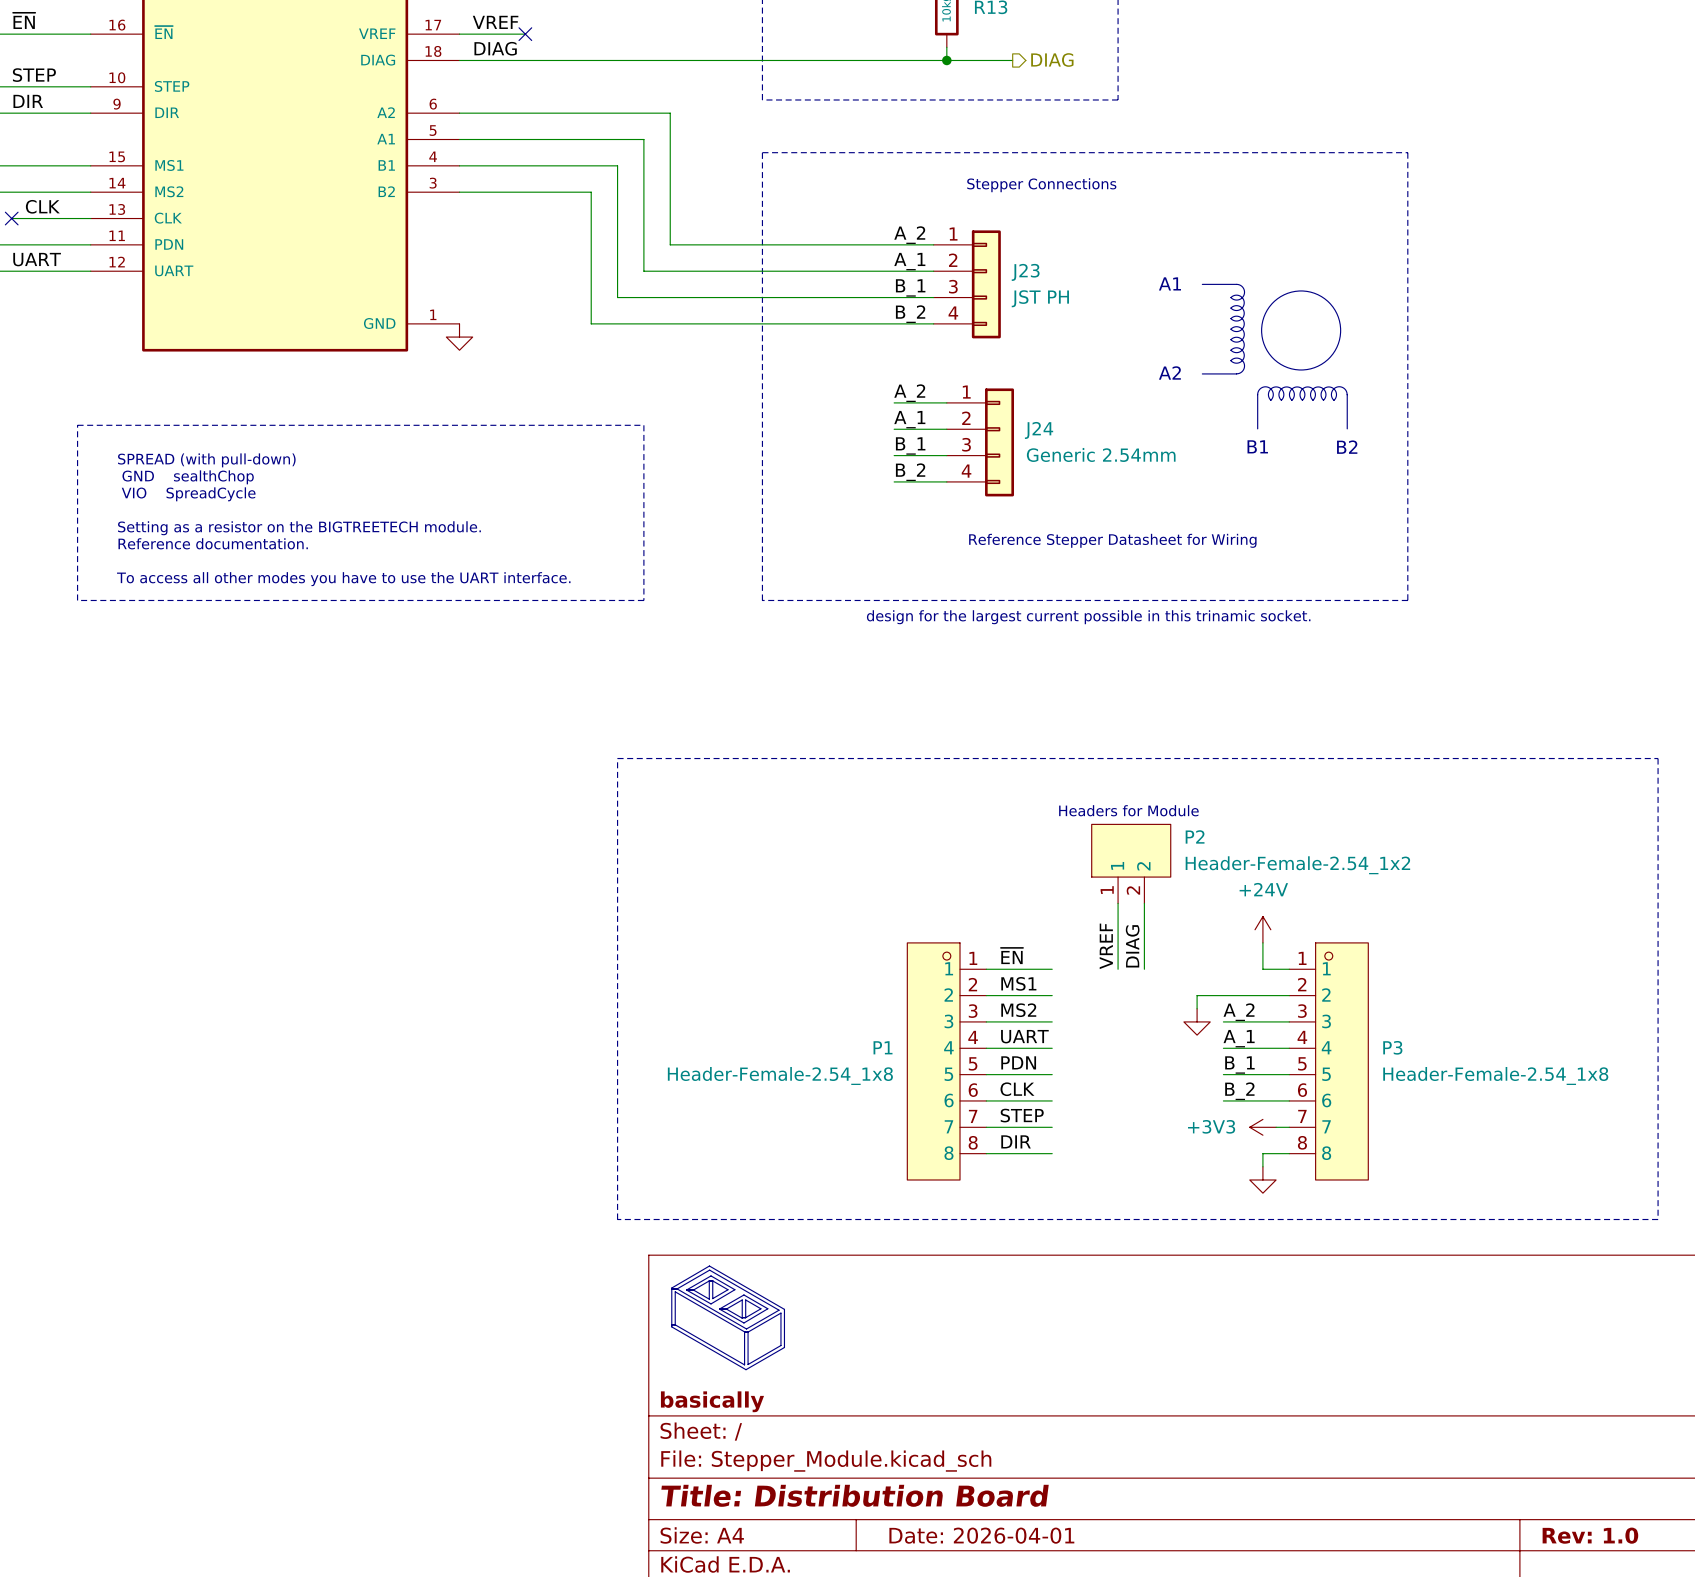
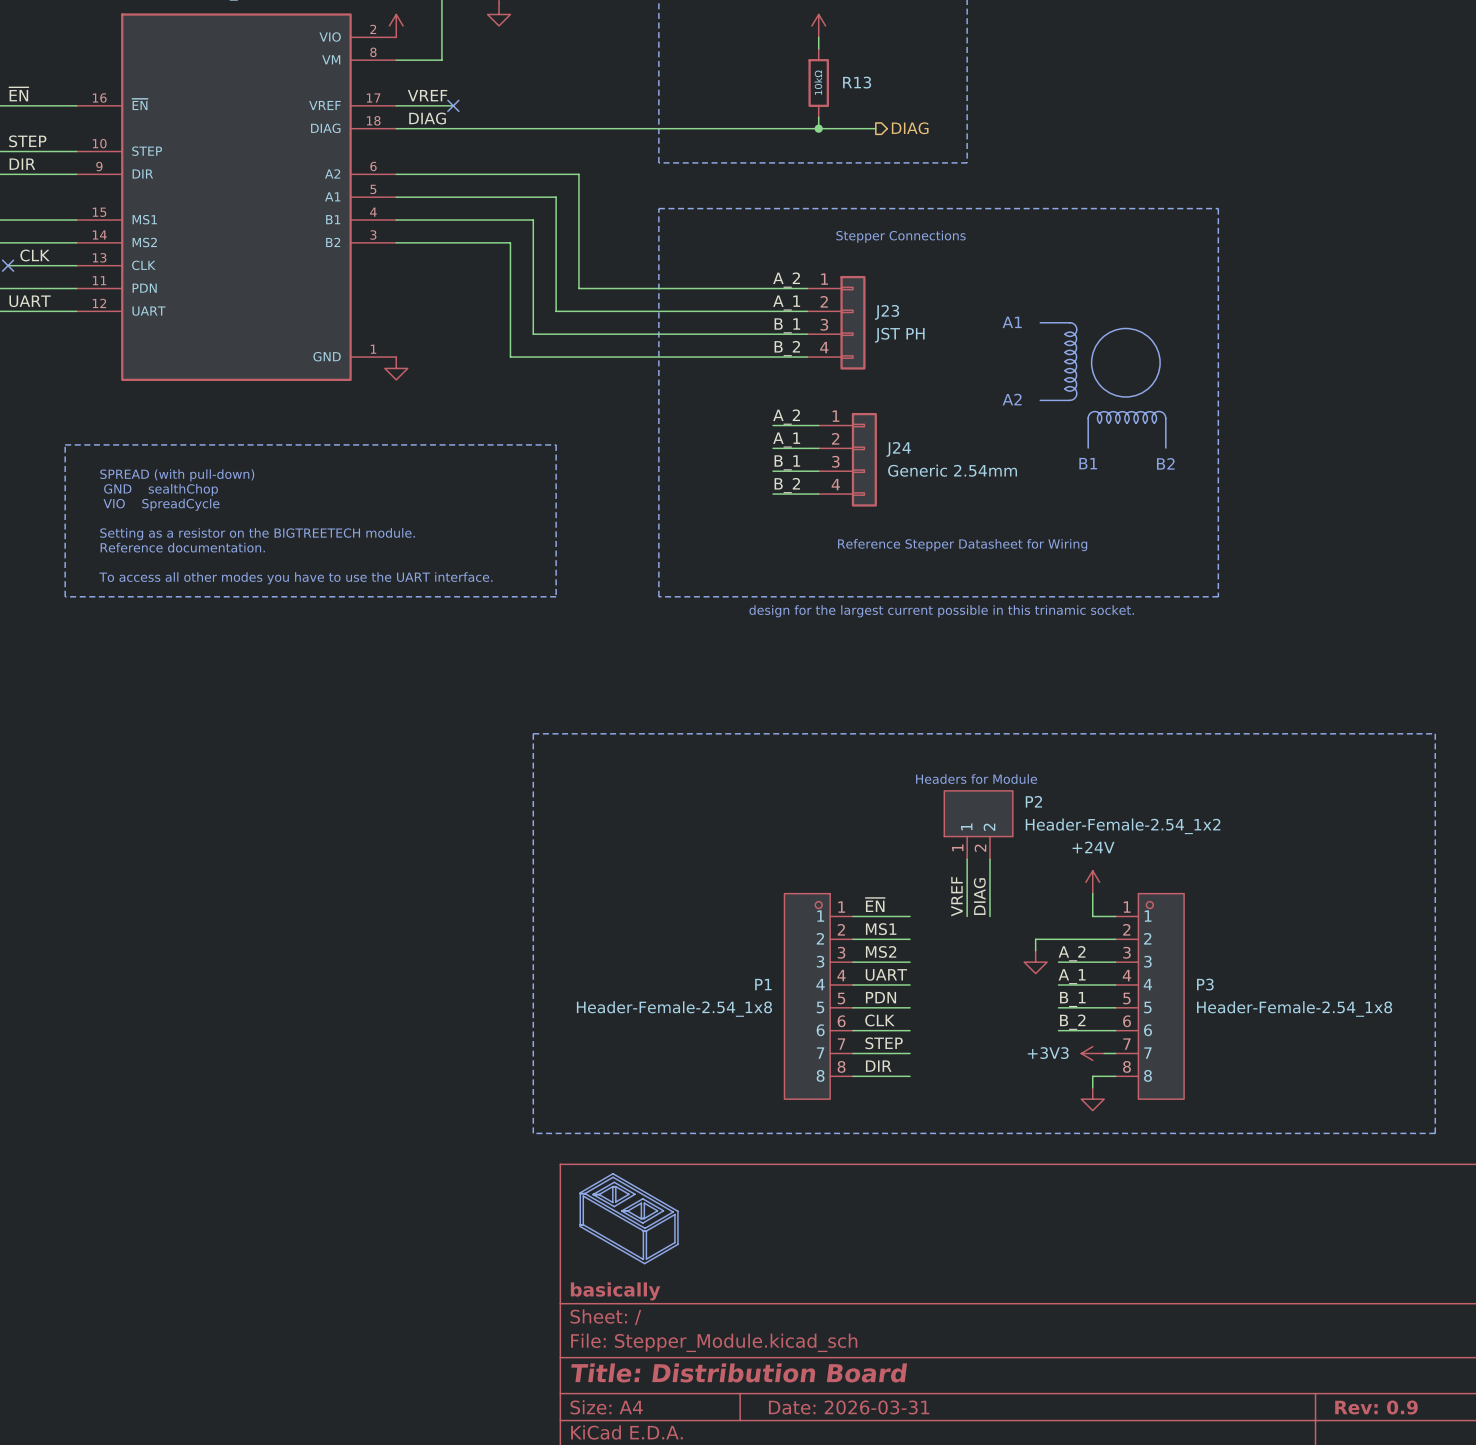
title block: Date: 2026-04-01 (981, 1535) -> Date: 2026-03-31 (849, 1407)
title block: Rev: 1.0 (1590, 1535) -> Rev: 0.9 (1376, 1407)

